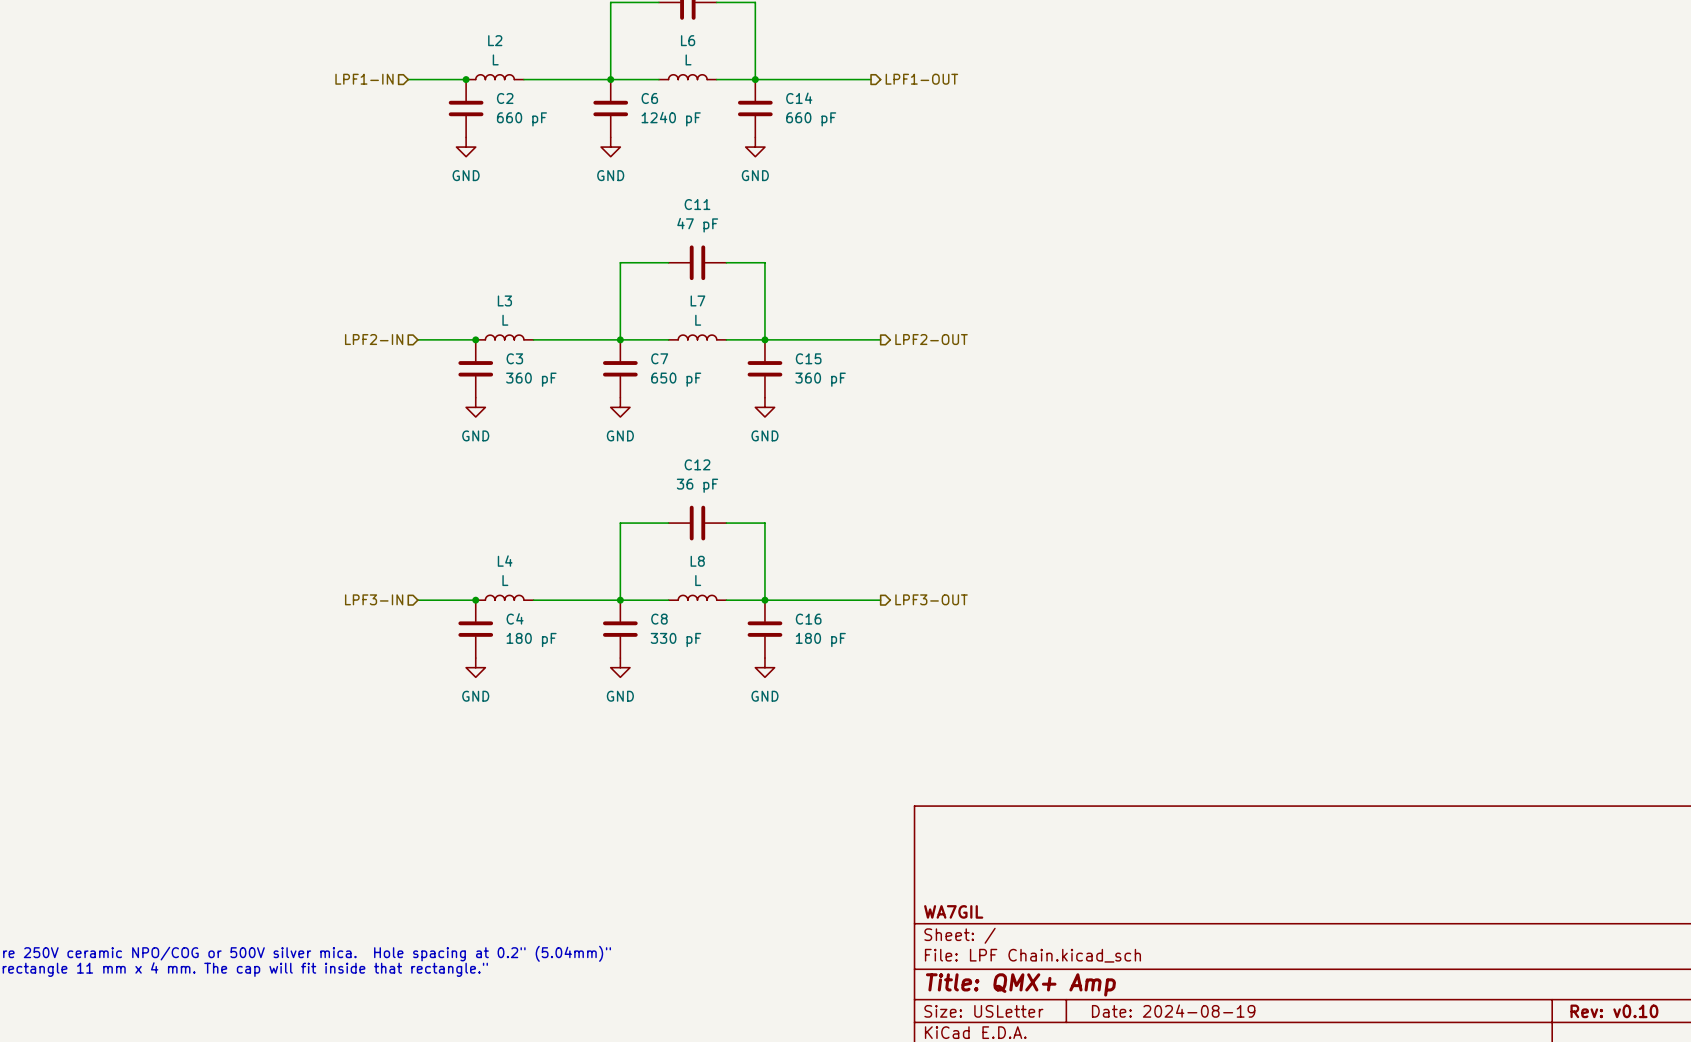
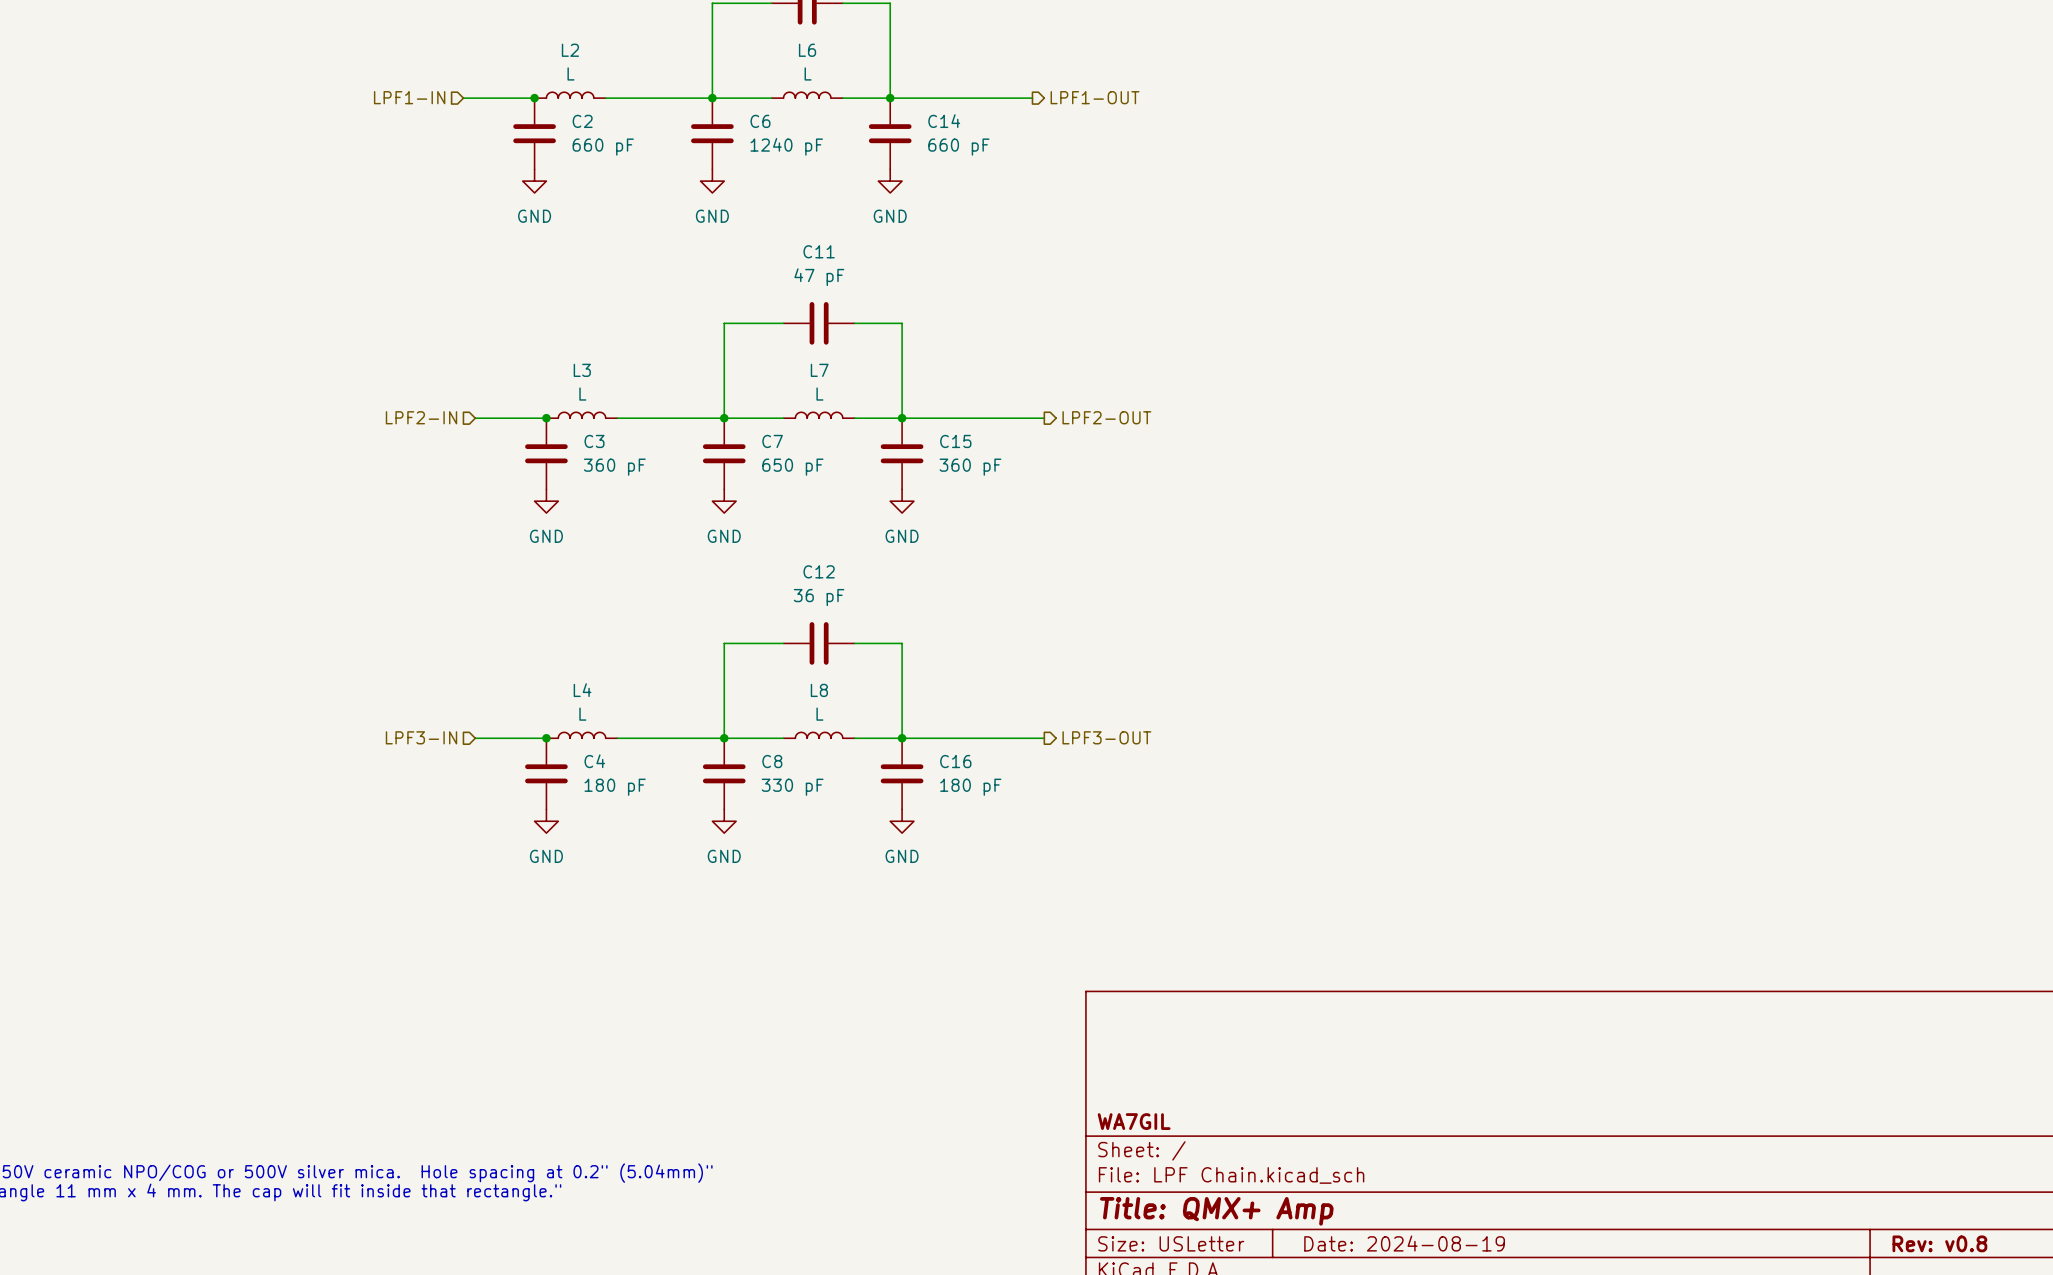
title block: Rev: v0.10 (1614, 1011) -> Rev: v0.8 (1939, 1243)

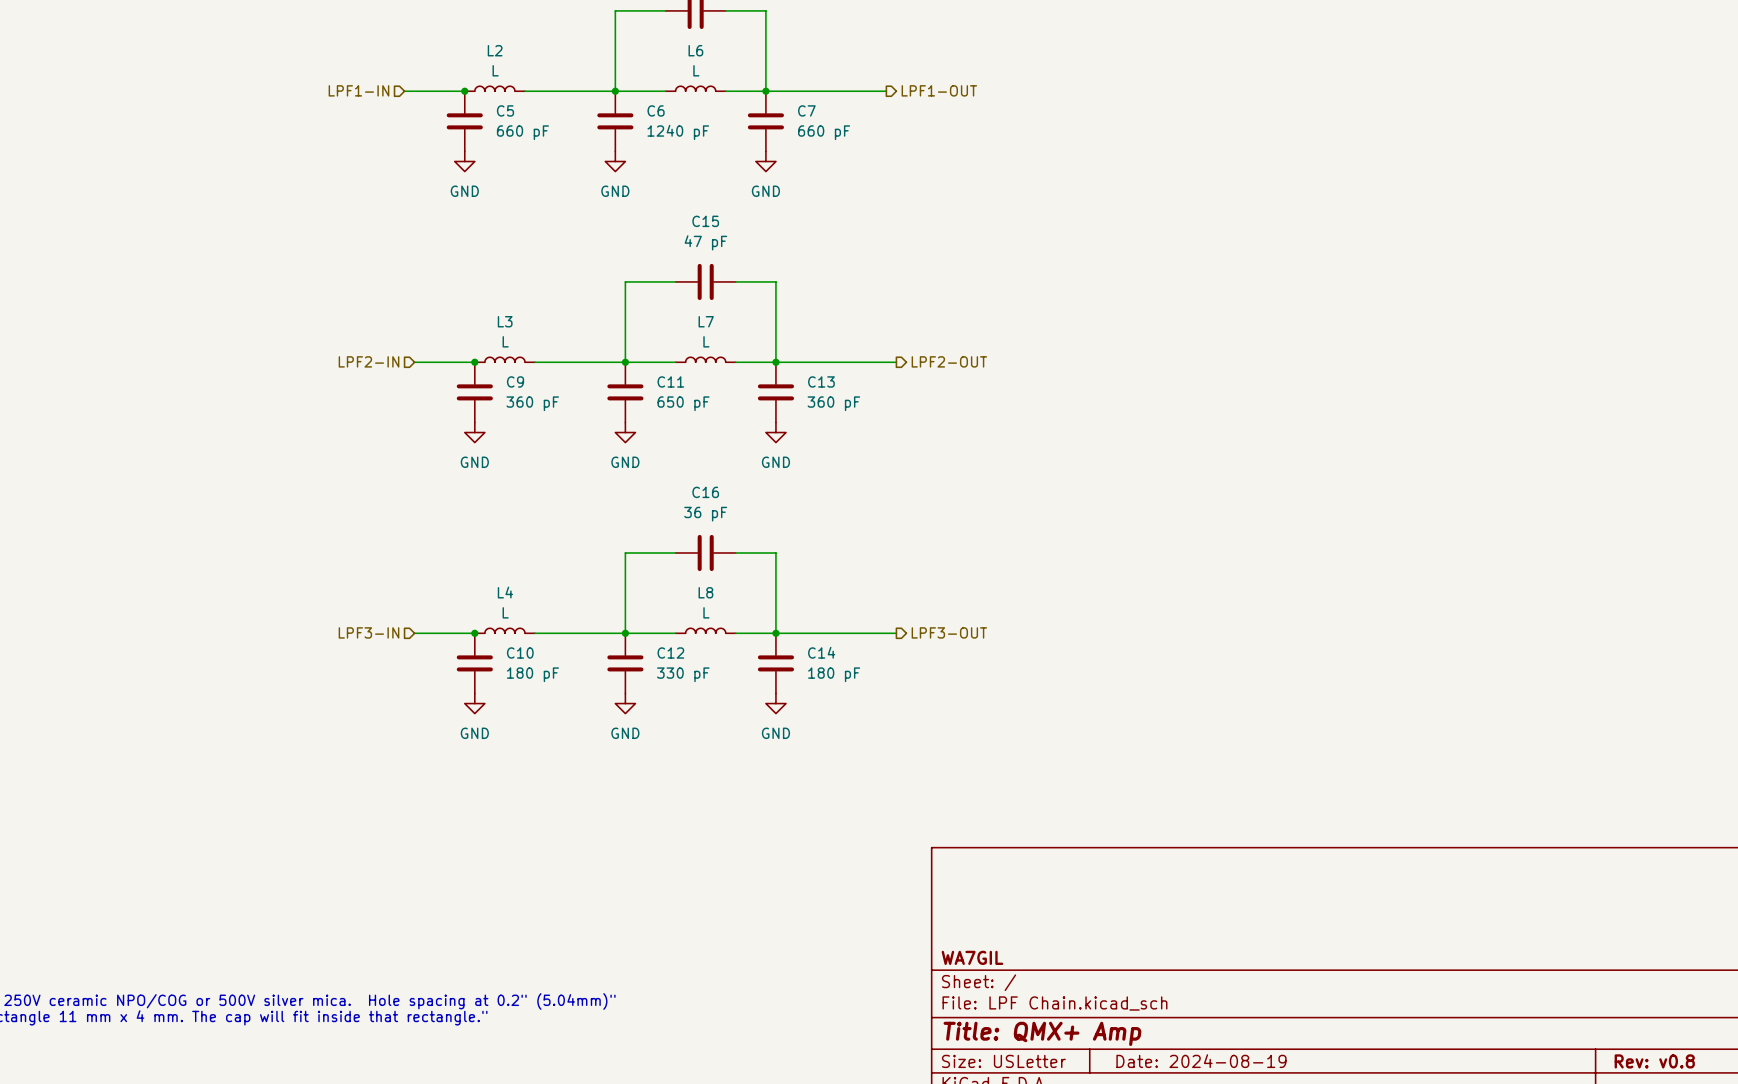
C2 name: C2 (582, 121) -> C5 (505, 110)
C14 name: C14 (944, 121) -> C7 (806, 110)
C11 name: C11 (819, 251) -> C15 (705, 221)
C3 name: C3 (594, 441) -> C9 (515, 381)
C7 name: C7 (772, 441) -> C11 (670, 381)
C15 name: C15 (955, 441) -> C13 (821, 381)
C12 name: C12 (819, 571) -> C16 (705, 492)
C4 name: C4 (594, 761) -> C10 (520, 653)
C8 name: C8 (772, 761) -> C12 (670, 653)
C16 name: C16 (955, 761) -> C14 (821, 652)

